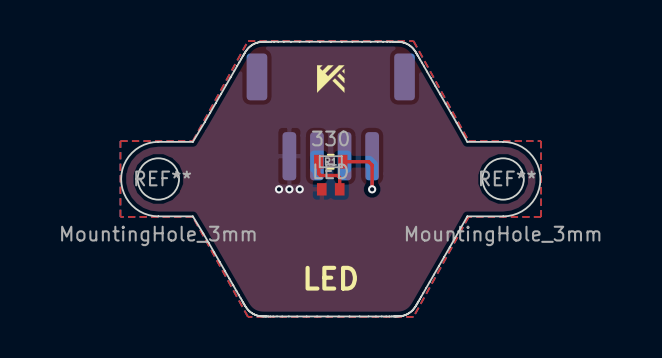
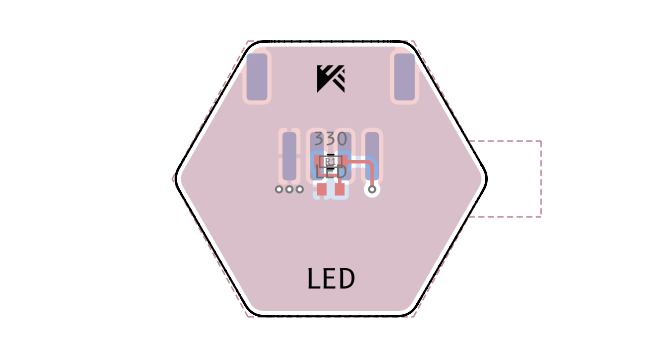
top zone outline: (248, 41) (192, 141) (120, 141) (120, 216) (192, 216) (248, 316) -> (248, 41) (172, 178) (248, 316)
board edge: (264, 41) (253, 44) (246, 50) (192, 141) (153, 142) (139, 146) (126, 160) (121, 179) (126, 197) (139, 211) (153, 216) (192, 216) (244, 304) (252, 313) (264, 316) (396, 316) (406, 314) (415, 306) (467, 216) (512, 215) (525, 208) (535, 197) (540, 183) (540, 174) (532, 156) (521, 146) (512, 143) (467, 141) (416, 53) (408, 44) (396, 41) (265, 41) -> none
board edge: none -> (481, 164) (416, 52) (409, 44) (397, 41) (263, 41) (253, 44) (245, 52) (178, 167) (175, 179) (179, 191) (245, 304) (253, 313) (264, 316) (398, 316) (408, 313) (415, 306) (483, 189) (486, 177) (481, 165)
REF**: MountingHole_3mm (158, 178) -> none
REF**: MountingHole_3mm (503, 178) -> none

